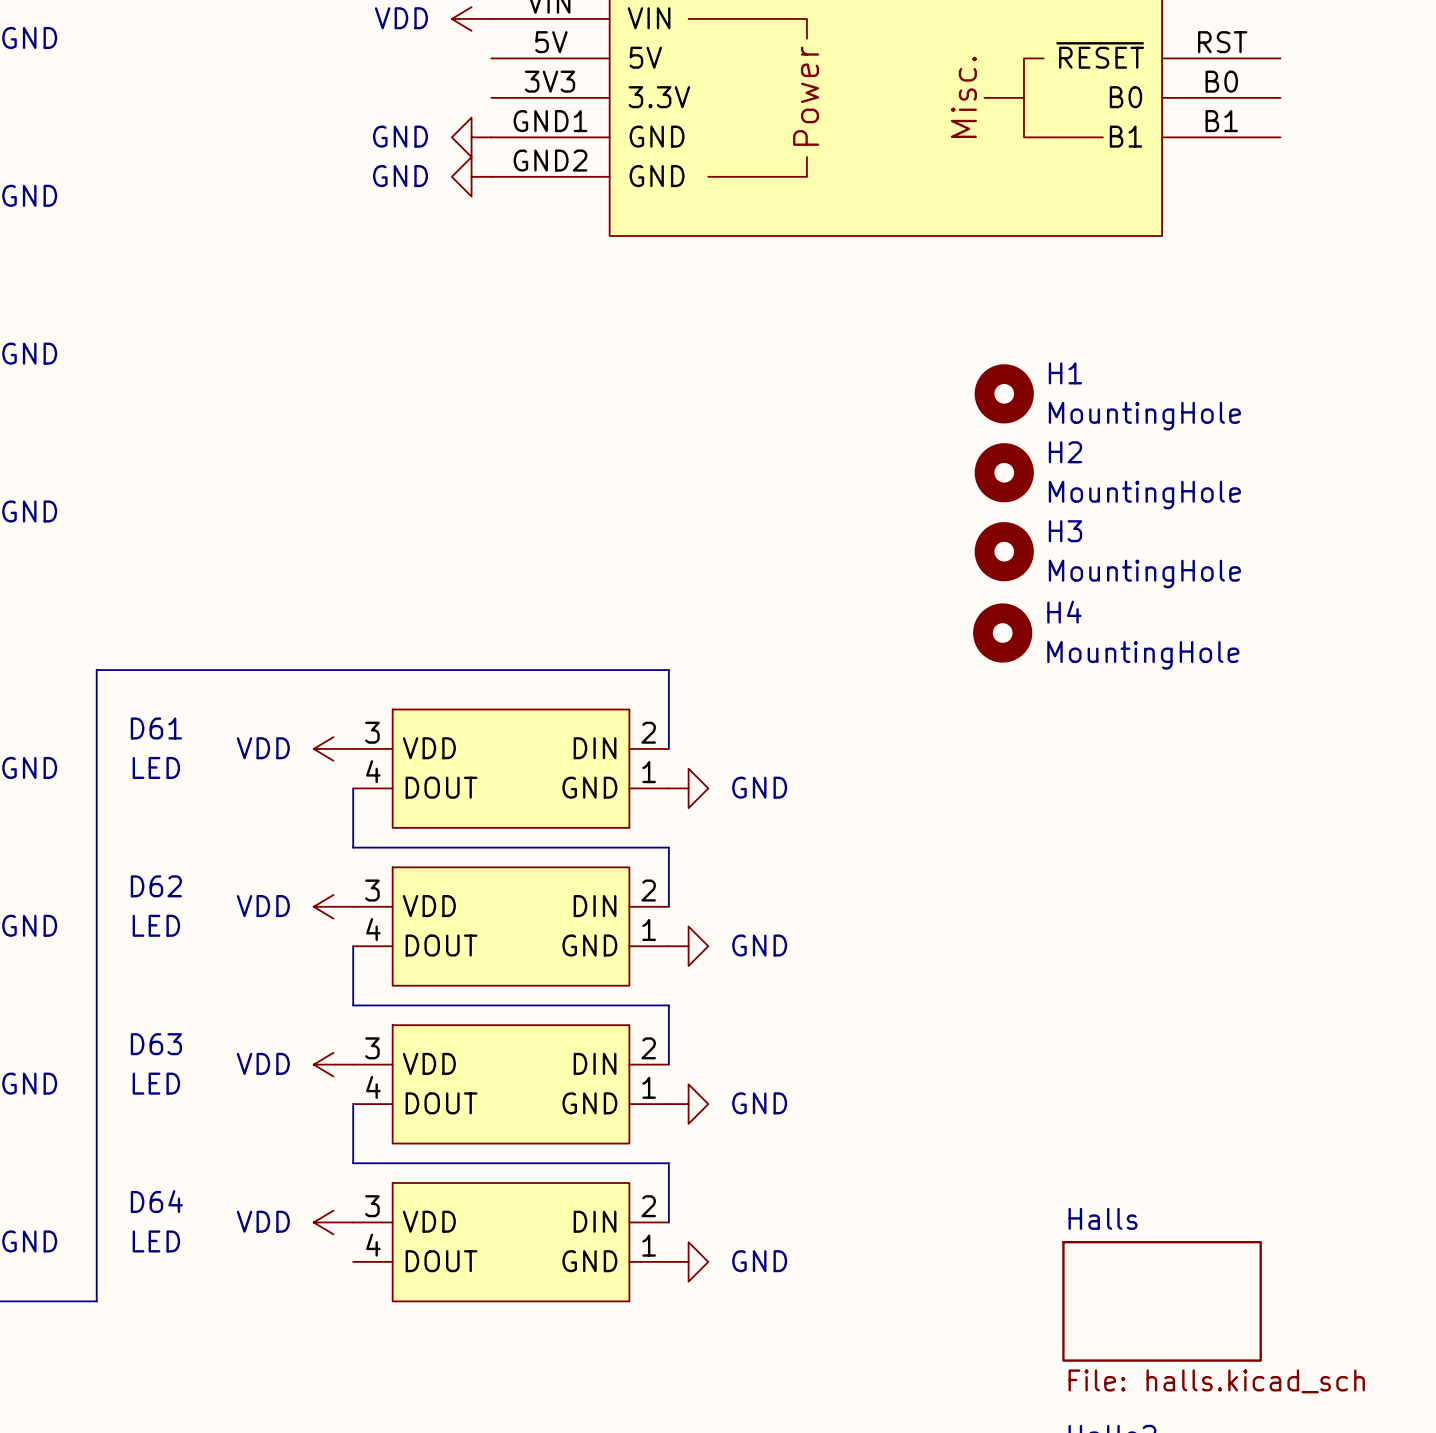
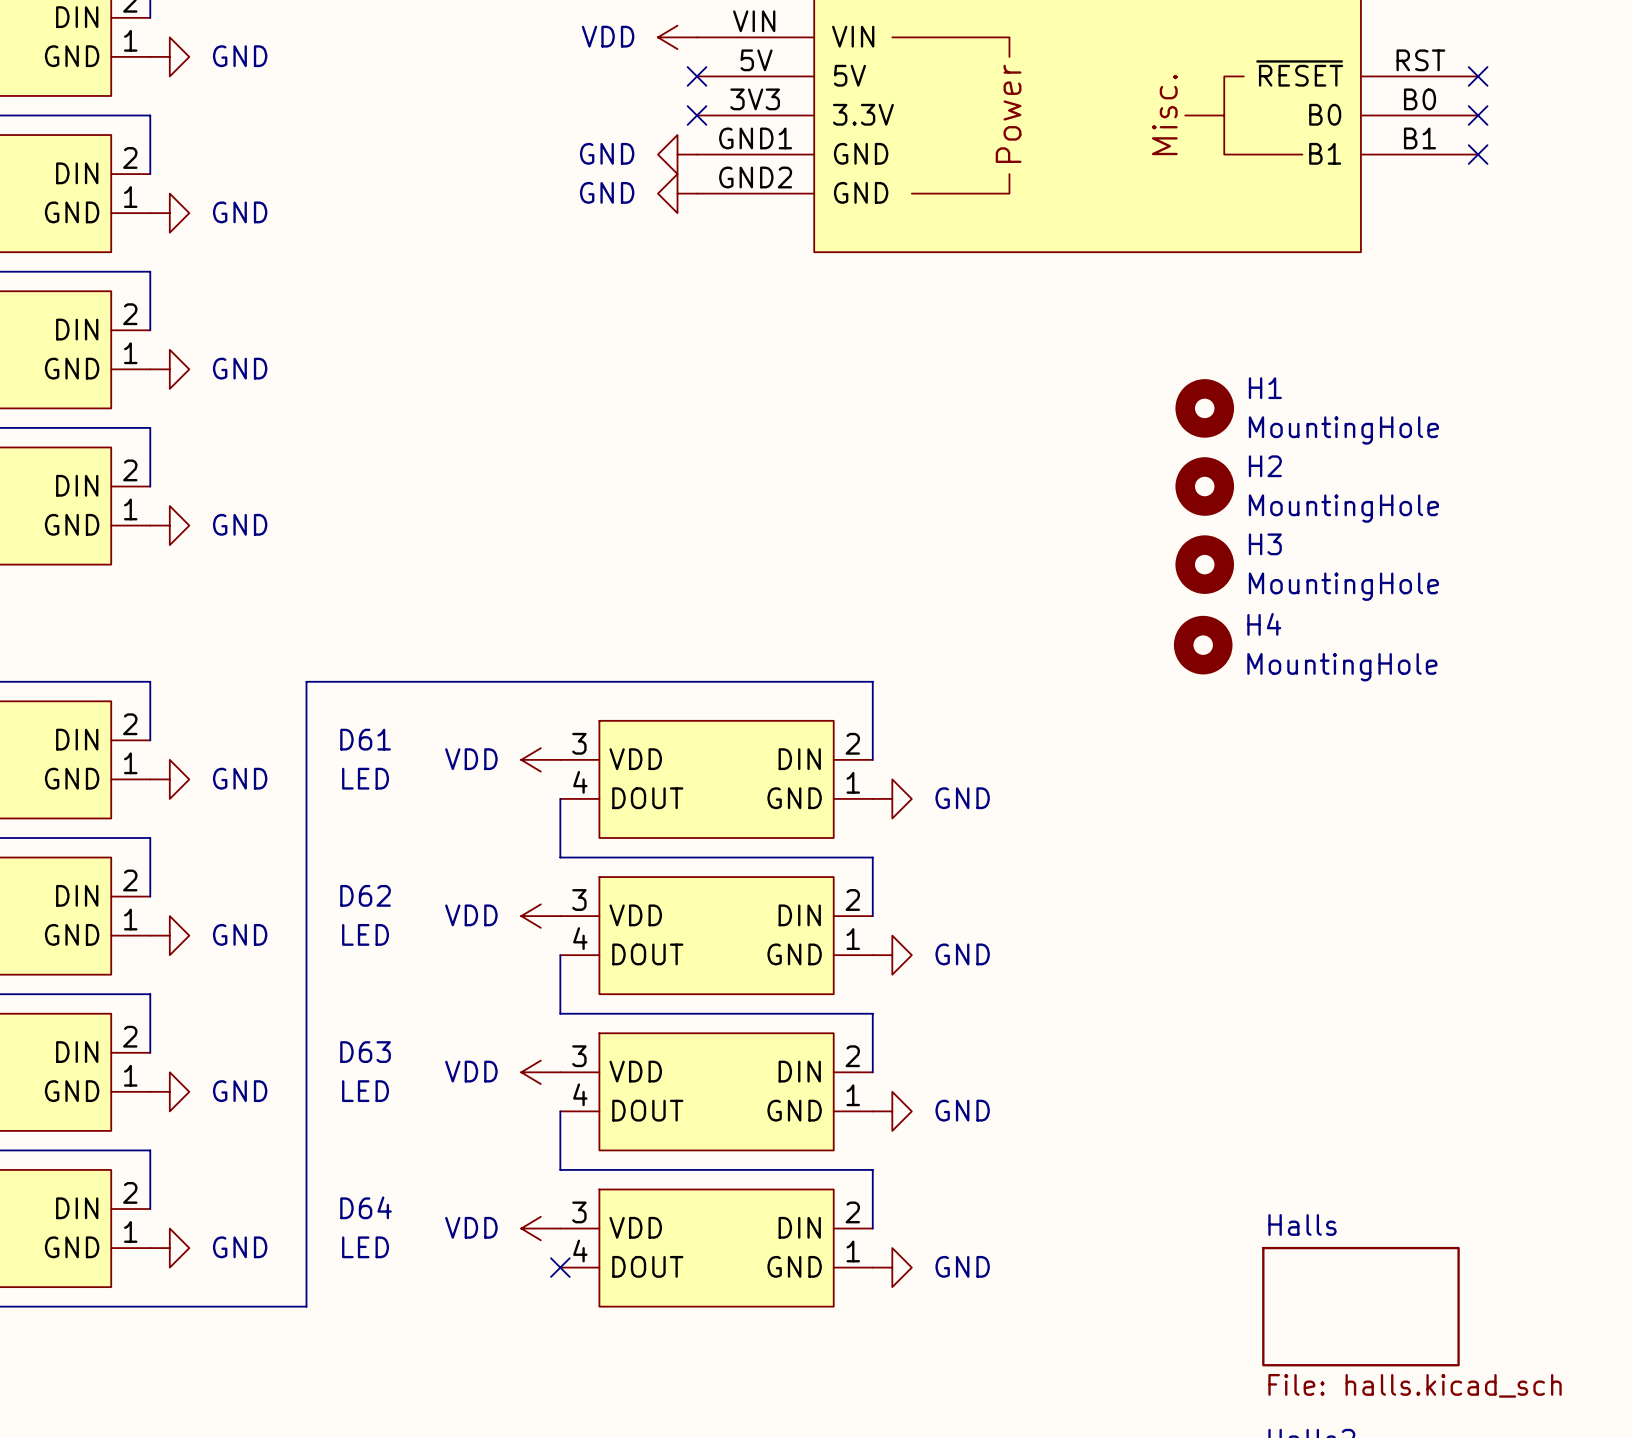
no-connect mark: none -> (697, 76)
no-connect mark: none -> (1478, 76)
no-connect mark: none -> (697, 115)
no-connect mark: none -> (1478, 115)
no-connect mark: none -> (1478, 154)
no-connect mark: none -> (560, 1267)

